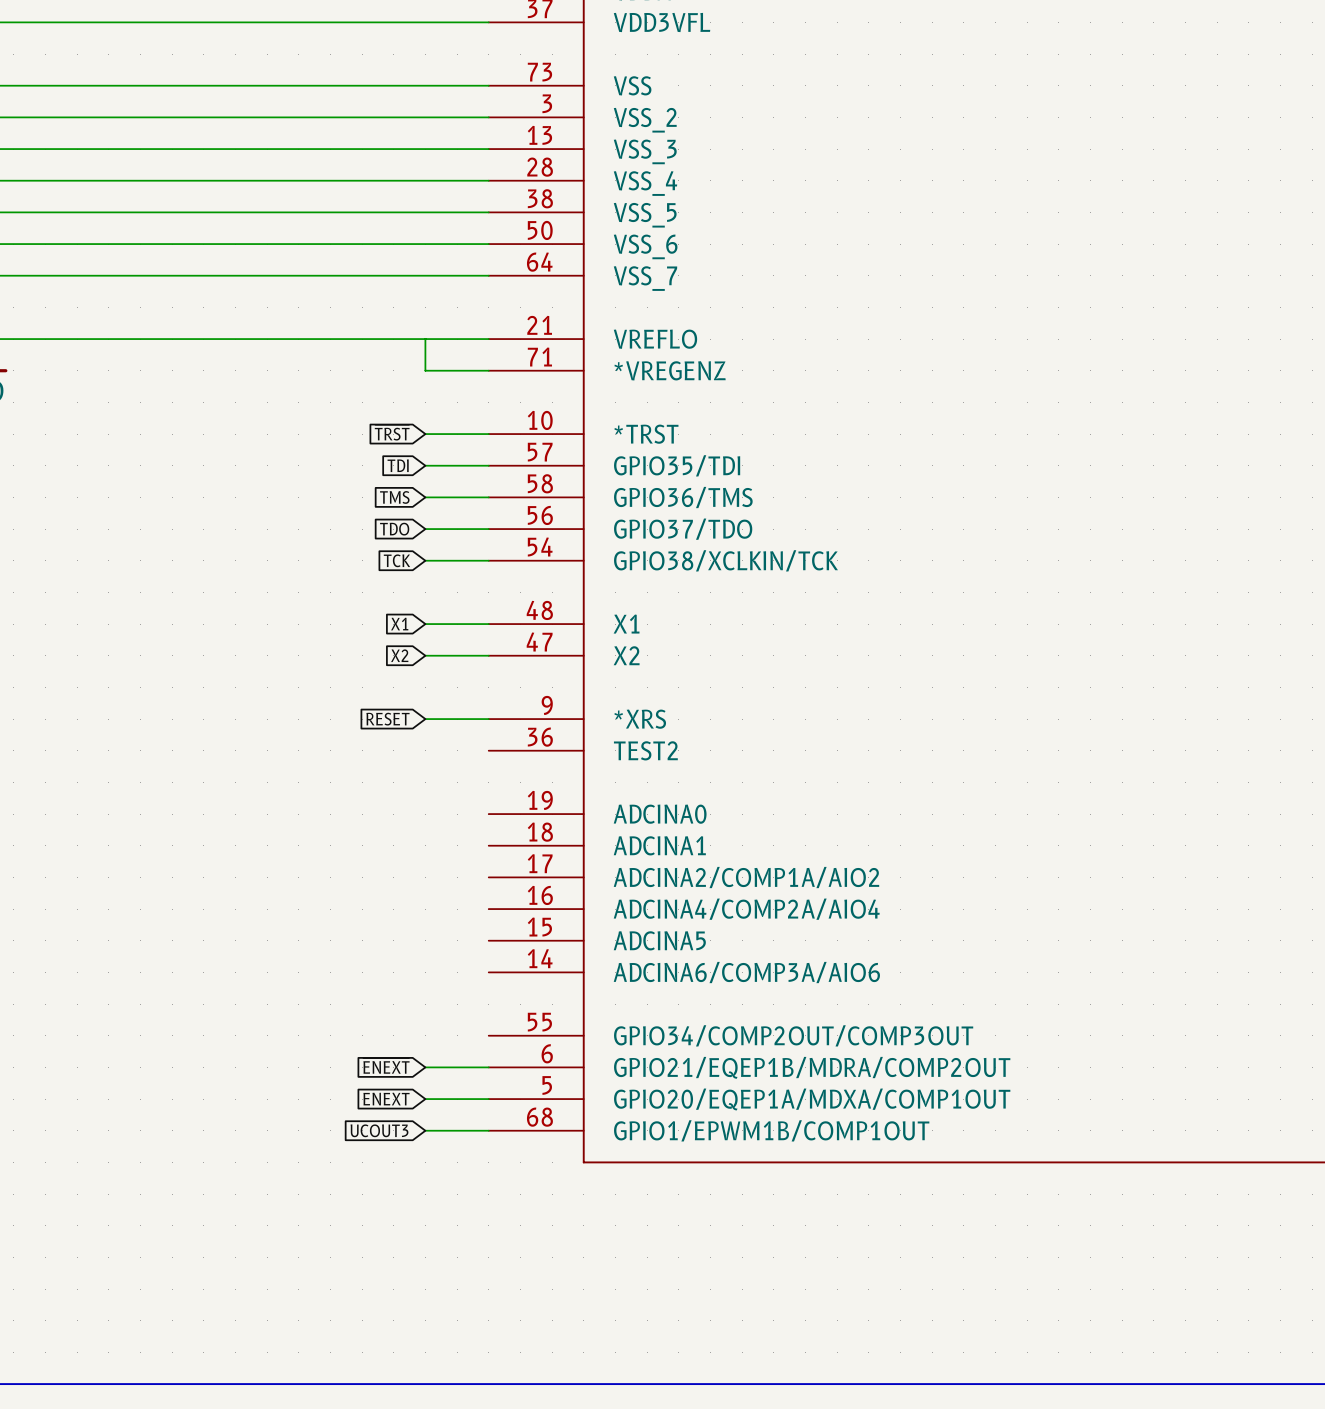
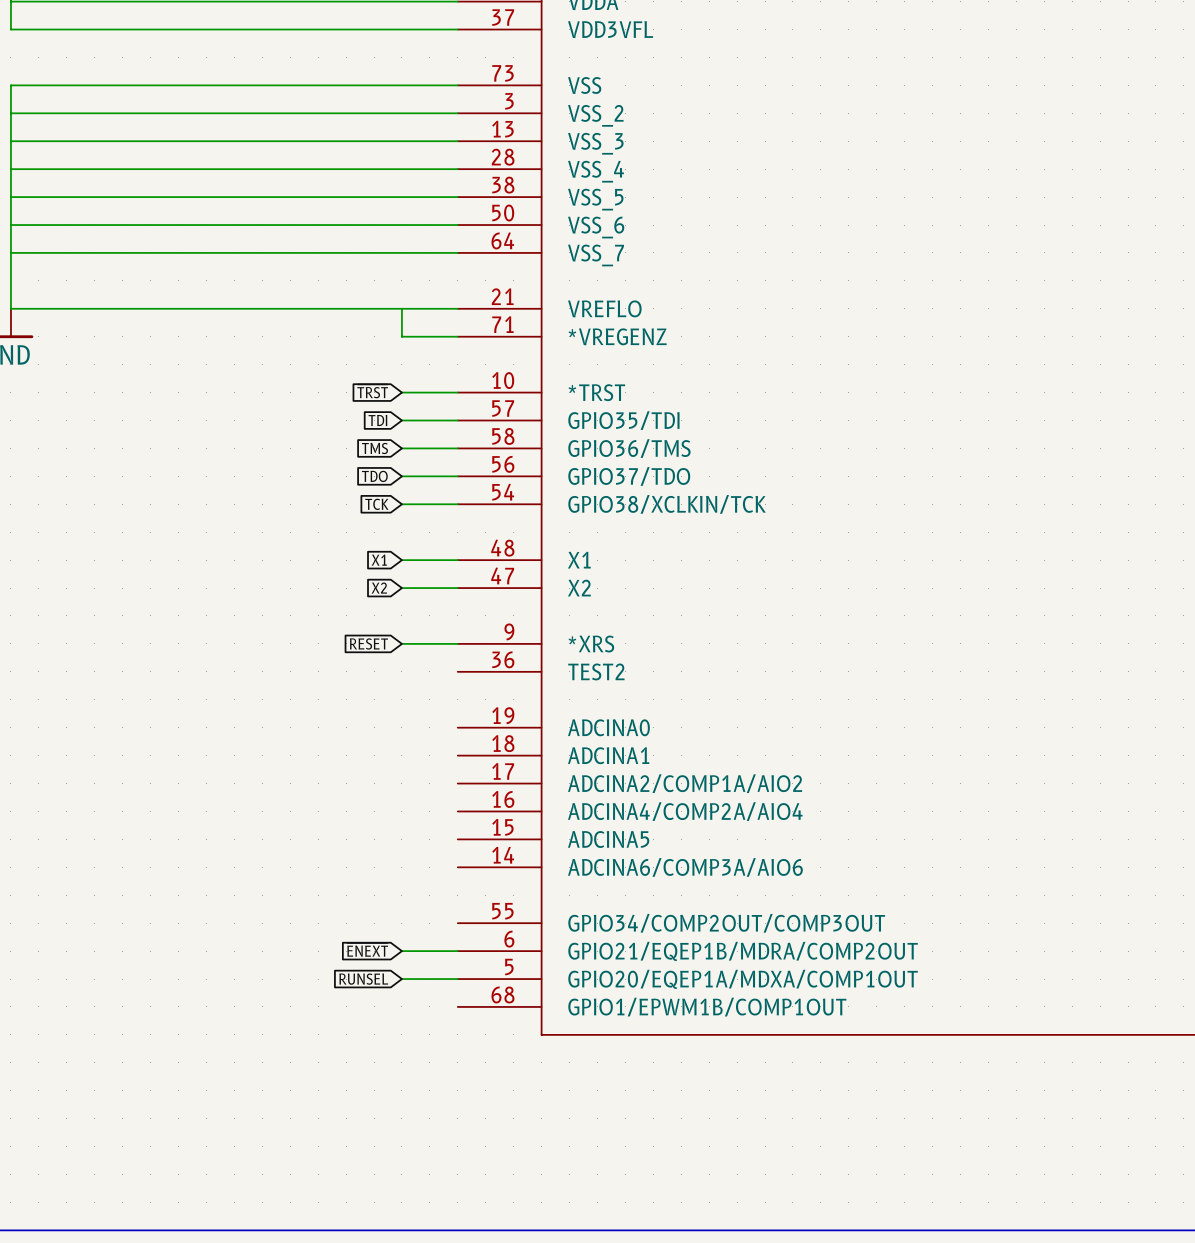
global label: ENEXT (386, 1099) -> RUNSEL (363, 979)
global label: UCOUT3 (379, 1130) -> none
wire: (425, 1130) (488, 1130) -> none

